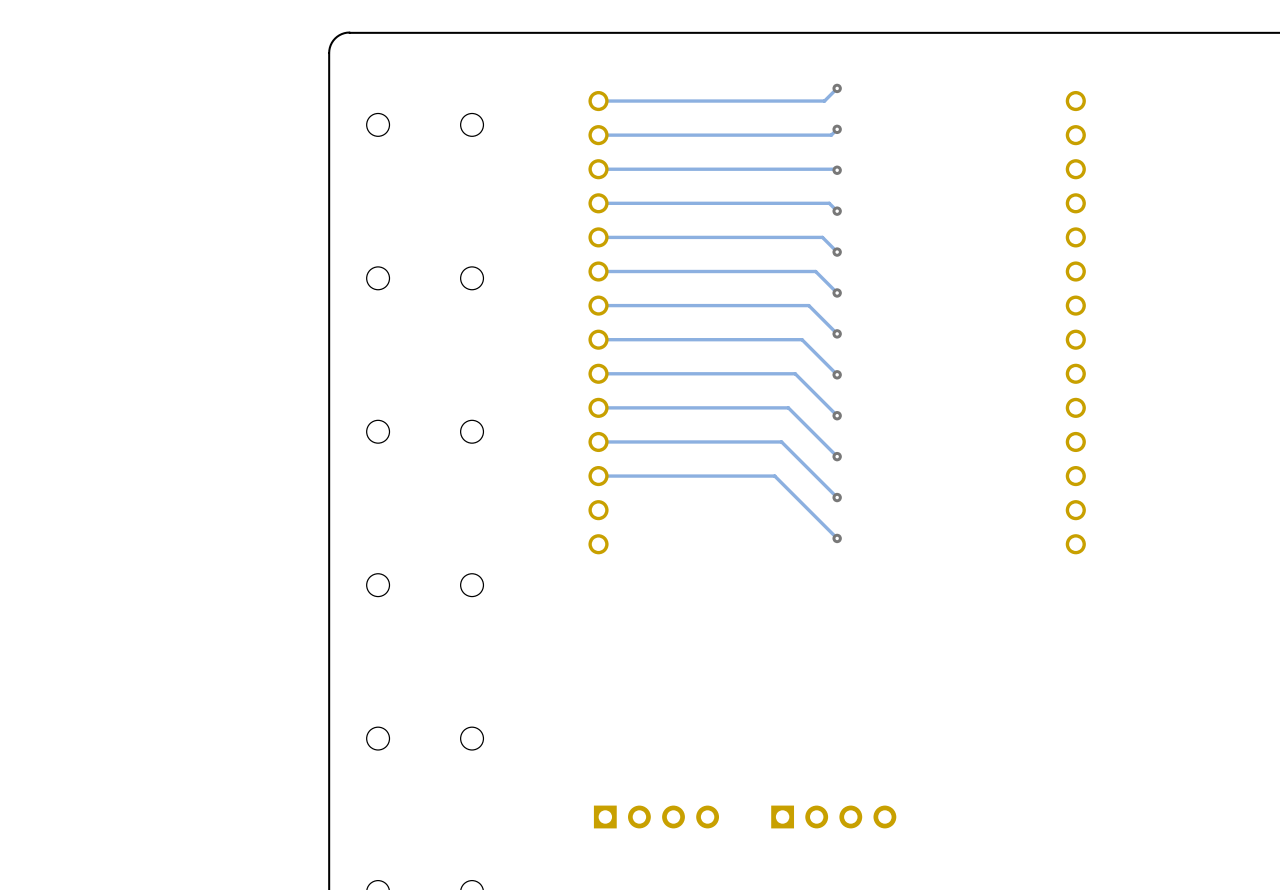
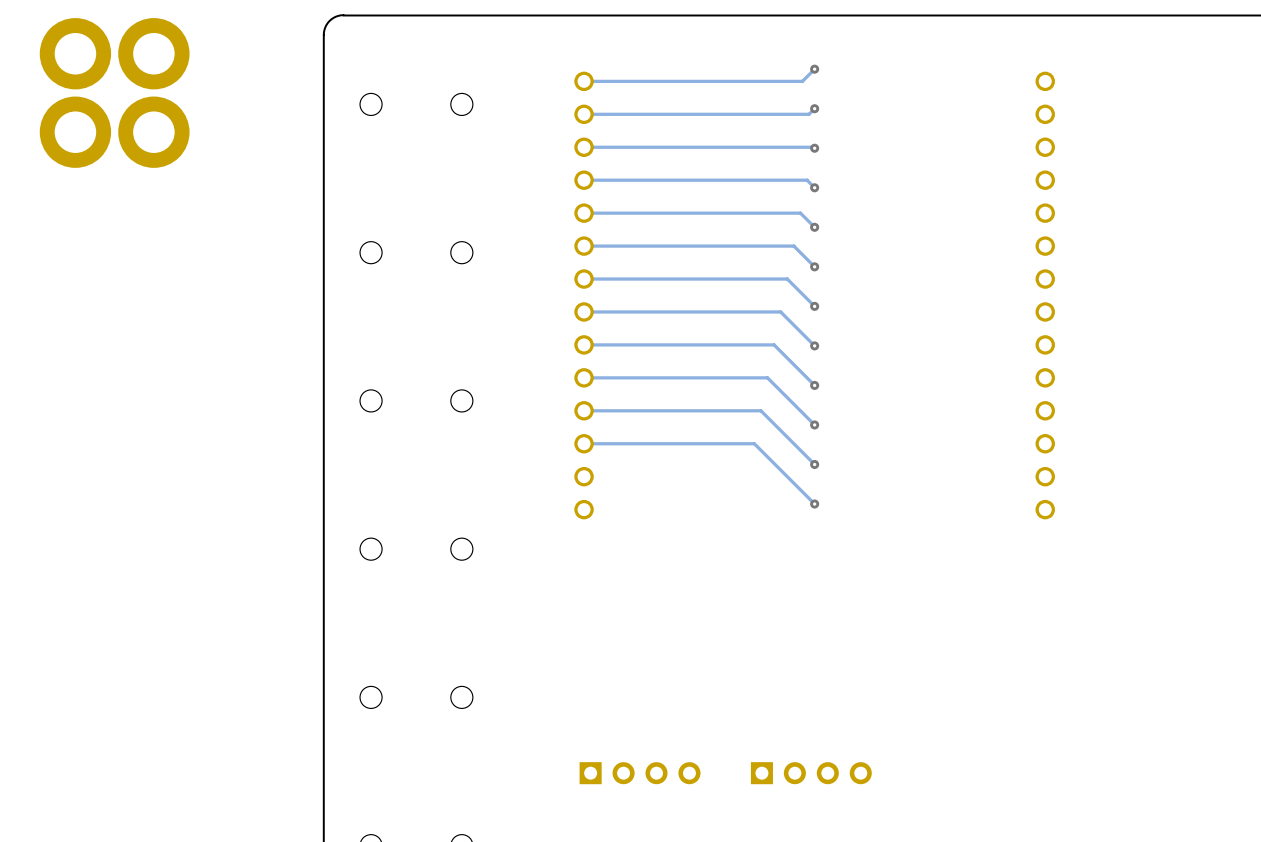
part: none -> (75, 53)
part: none -> (153, 53)
part: none -> (75, 132)
part: none -> (153, 132)

